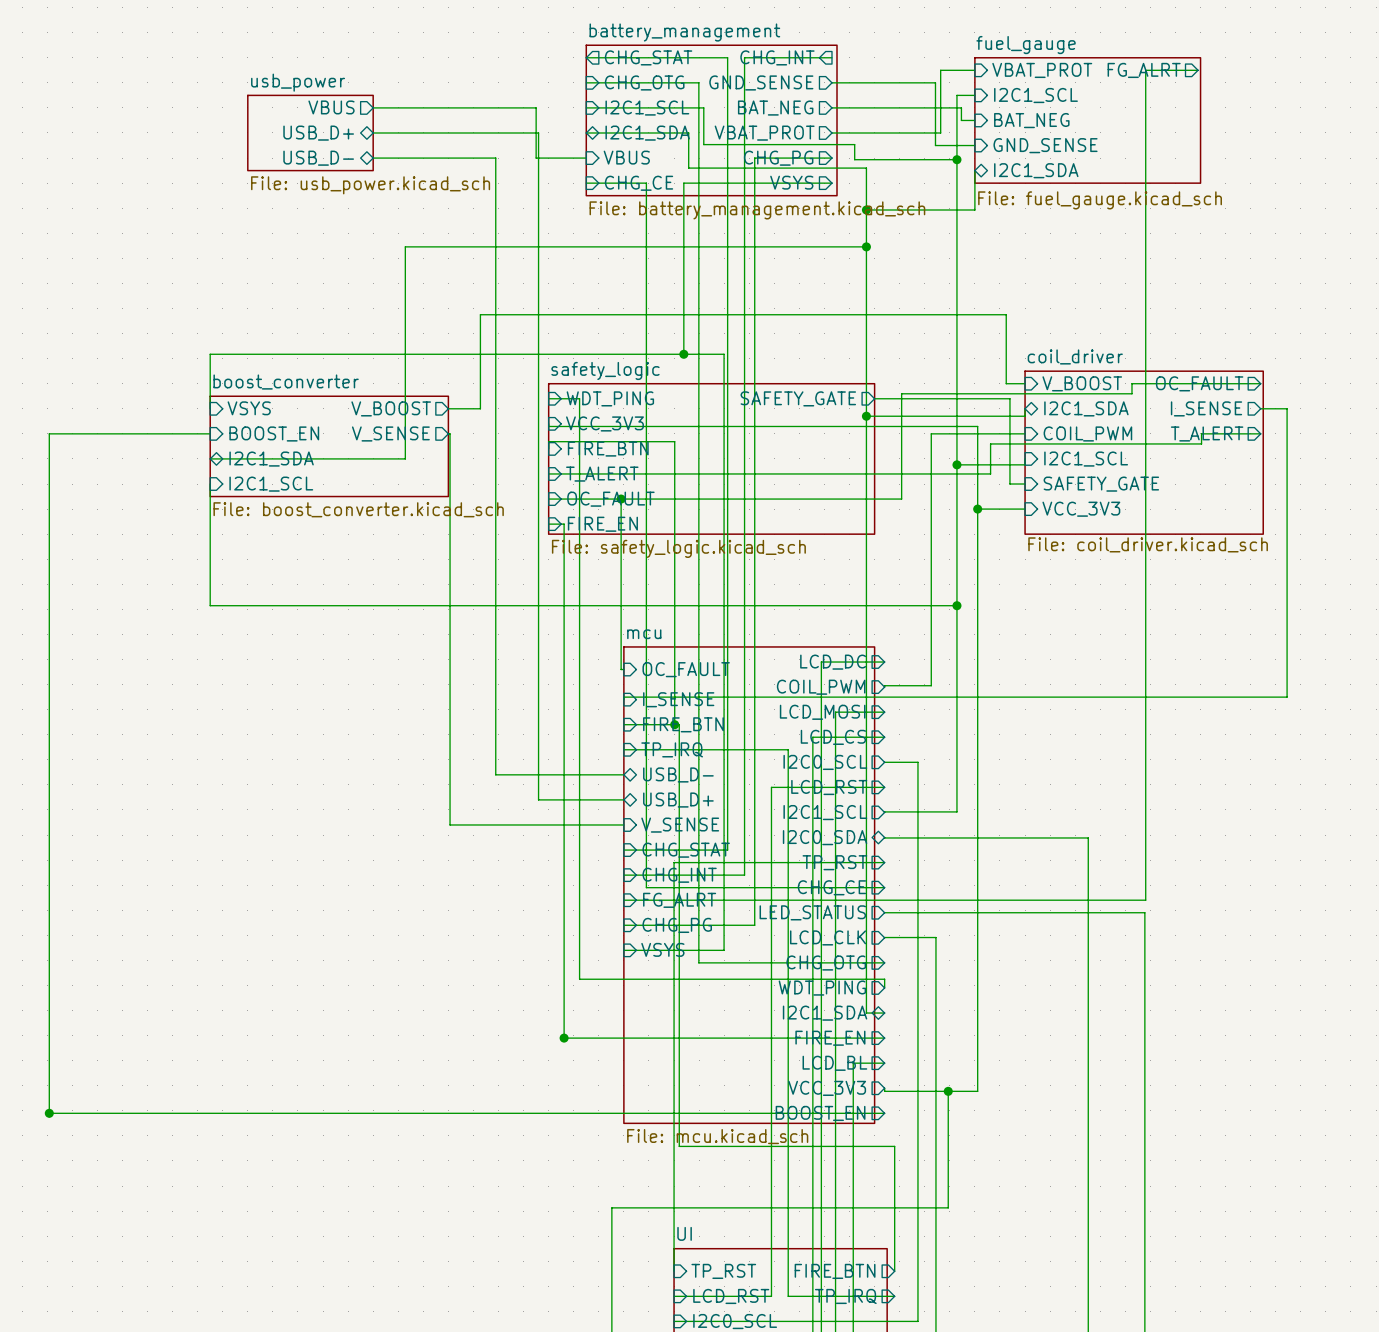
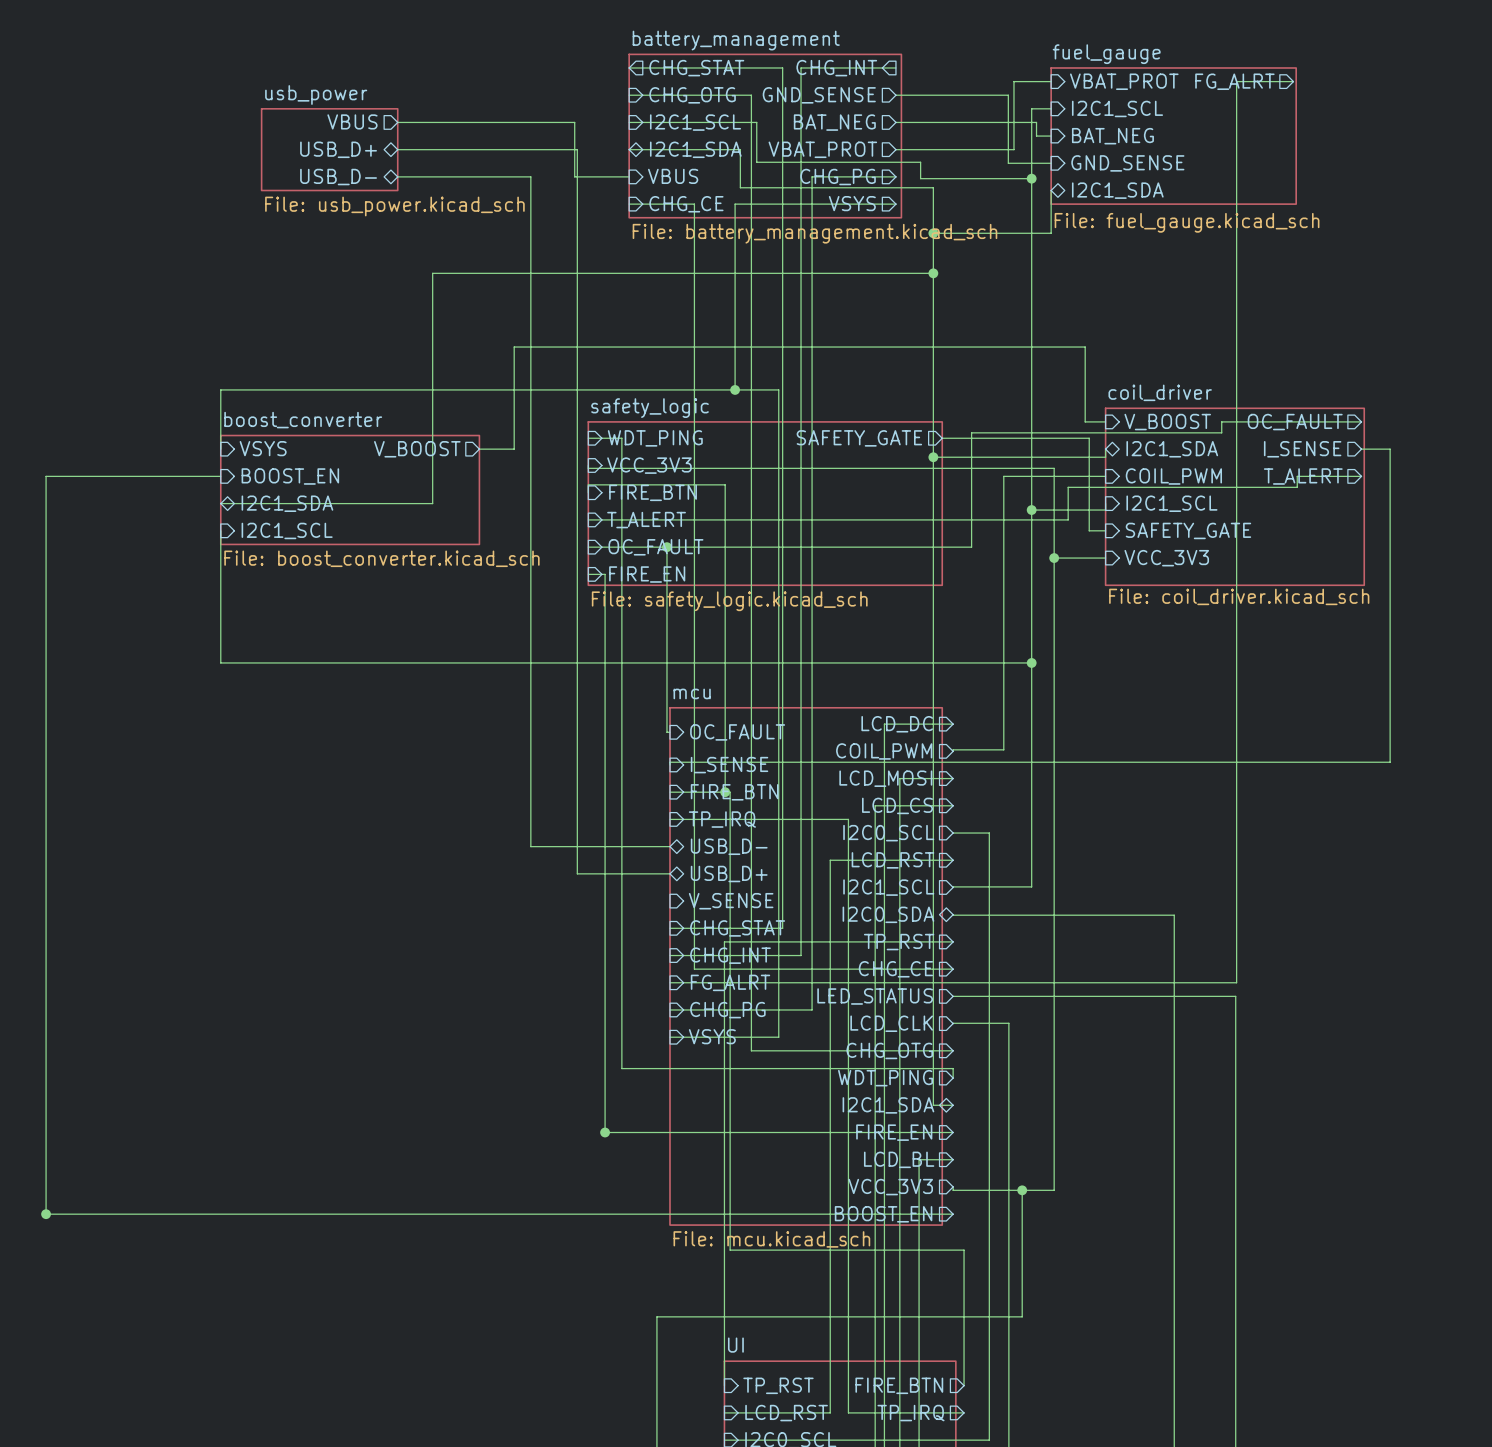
sheet pin: V_SENSE (390, 433) -> none
wire: (448, 433) (450, 433) (450, 824) (623, 824) -> none

